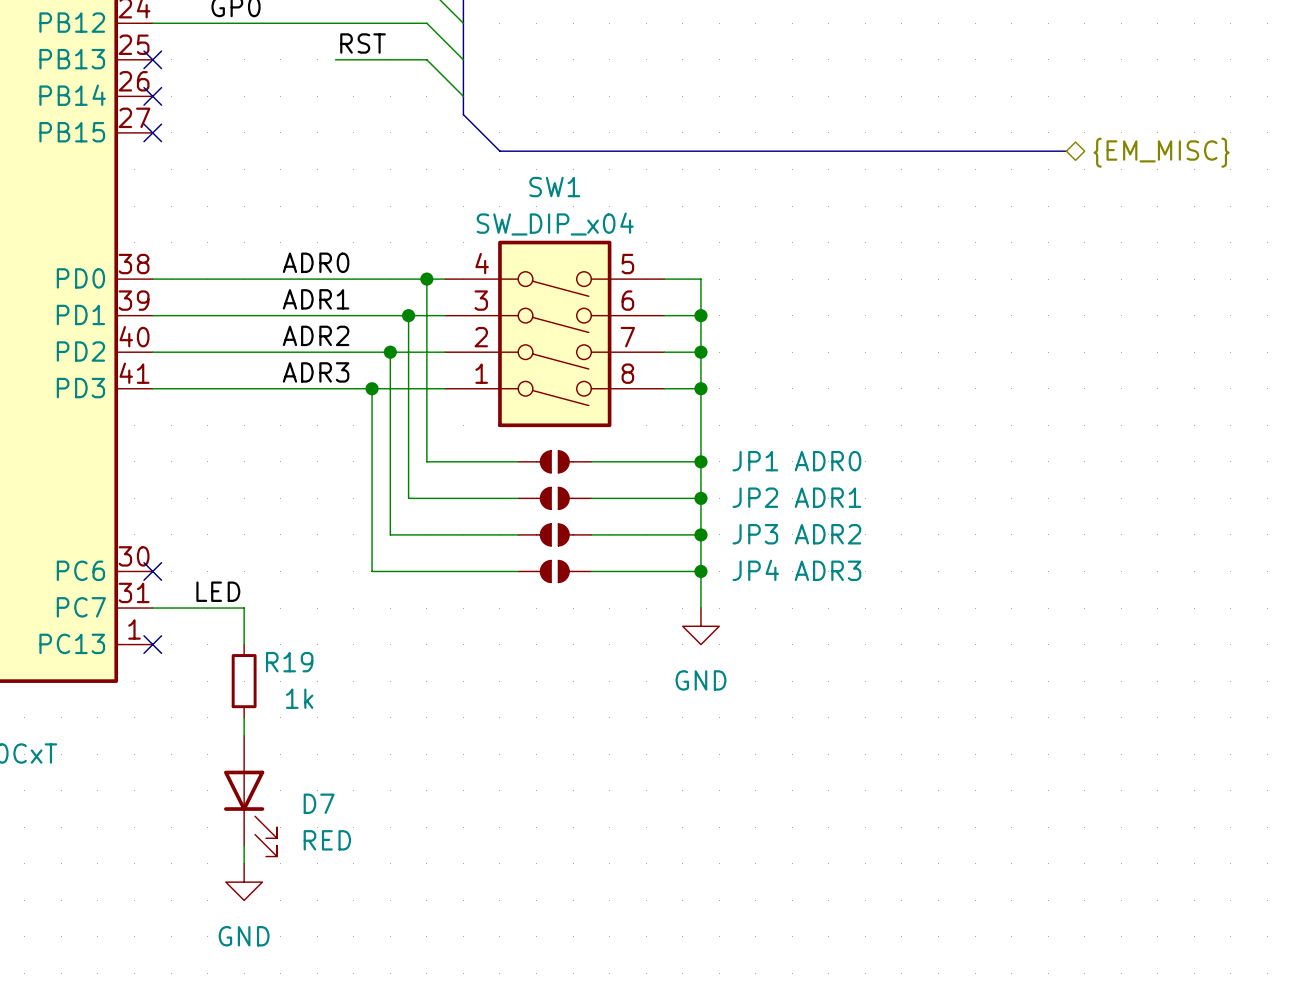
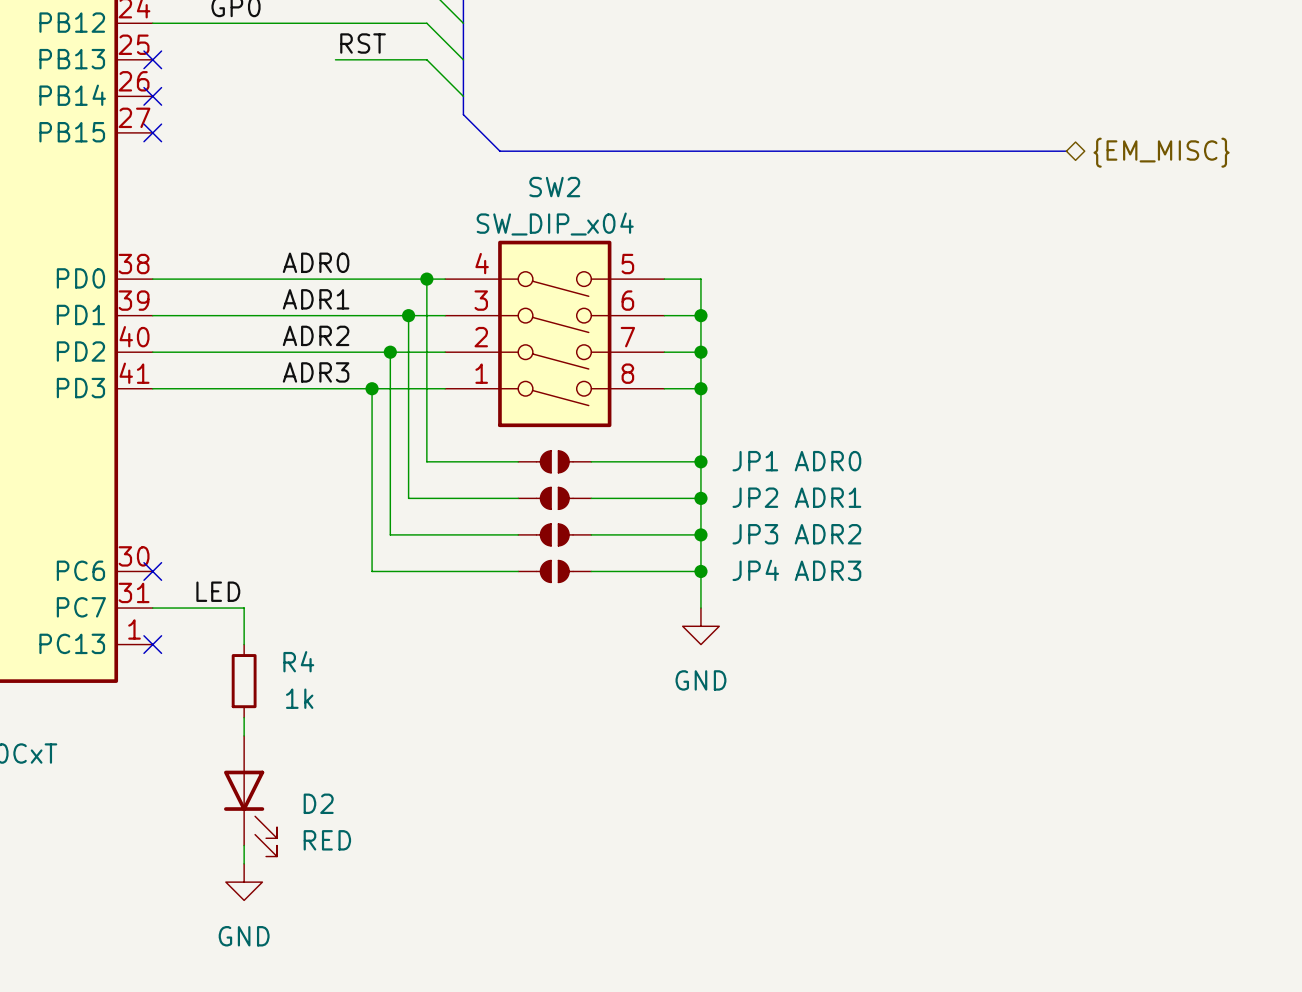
SW1 name: SW1 (554, 187) -> SW2 (554, 187)
R19 name: R19 (289, 662) -> R4 (298, 661)
D7 name: D7 (319, 803) -> D2 (318, 803)

